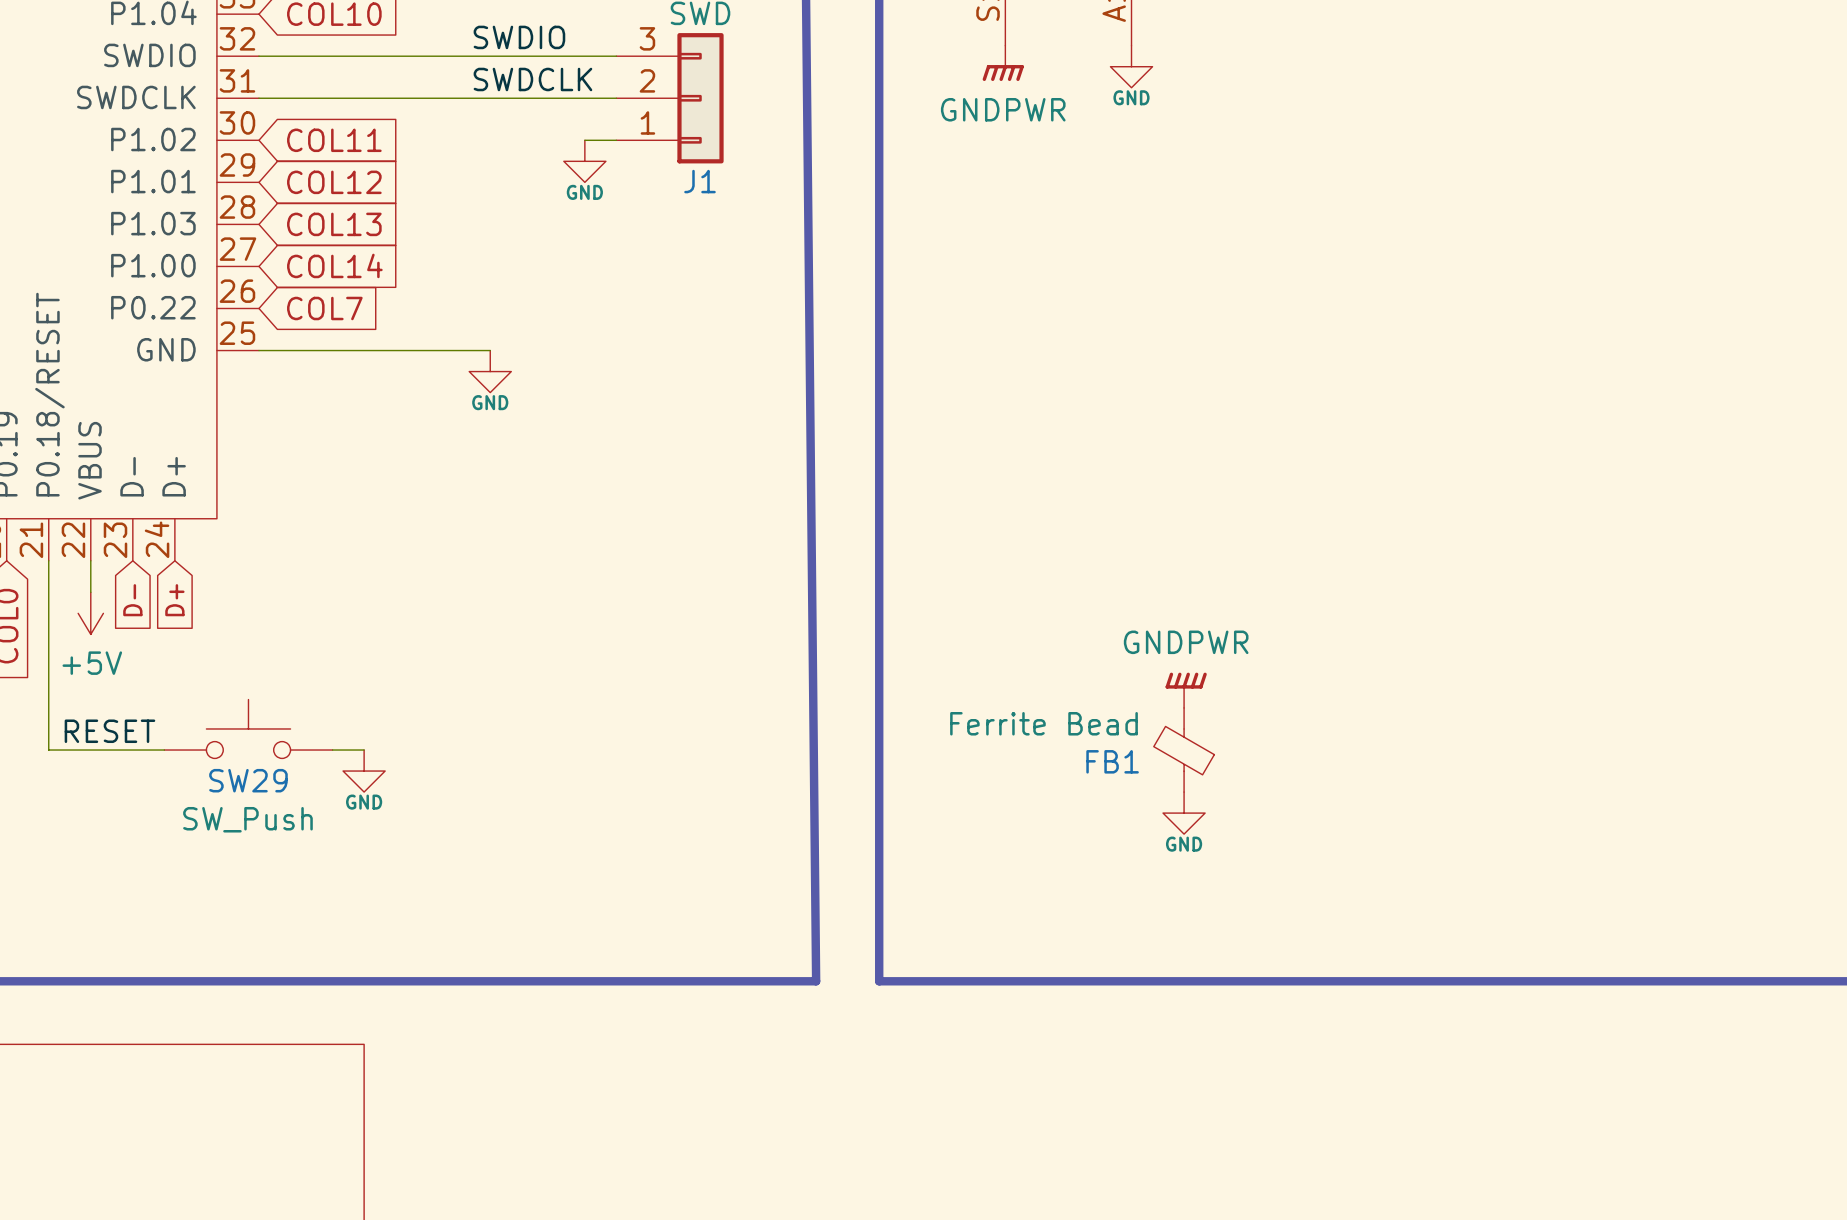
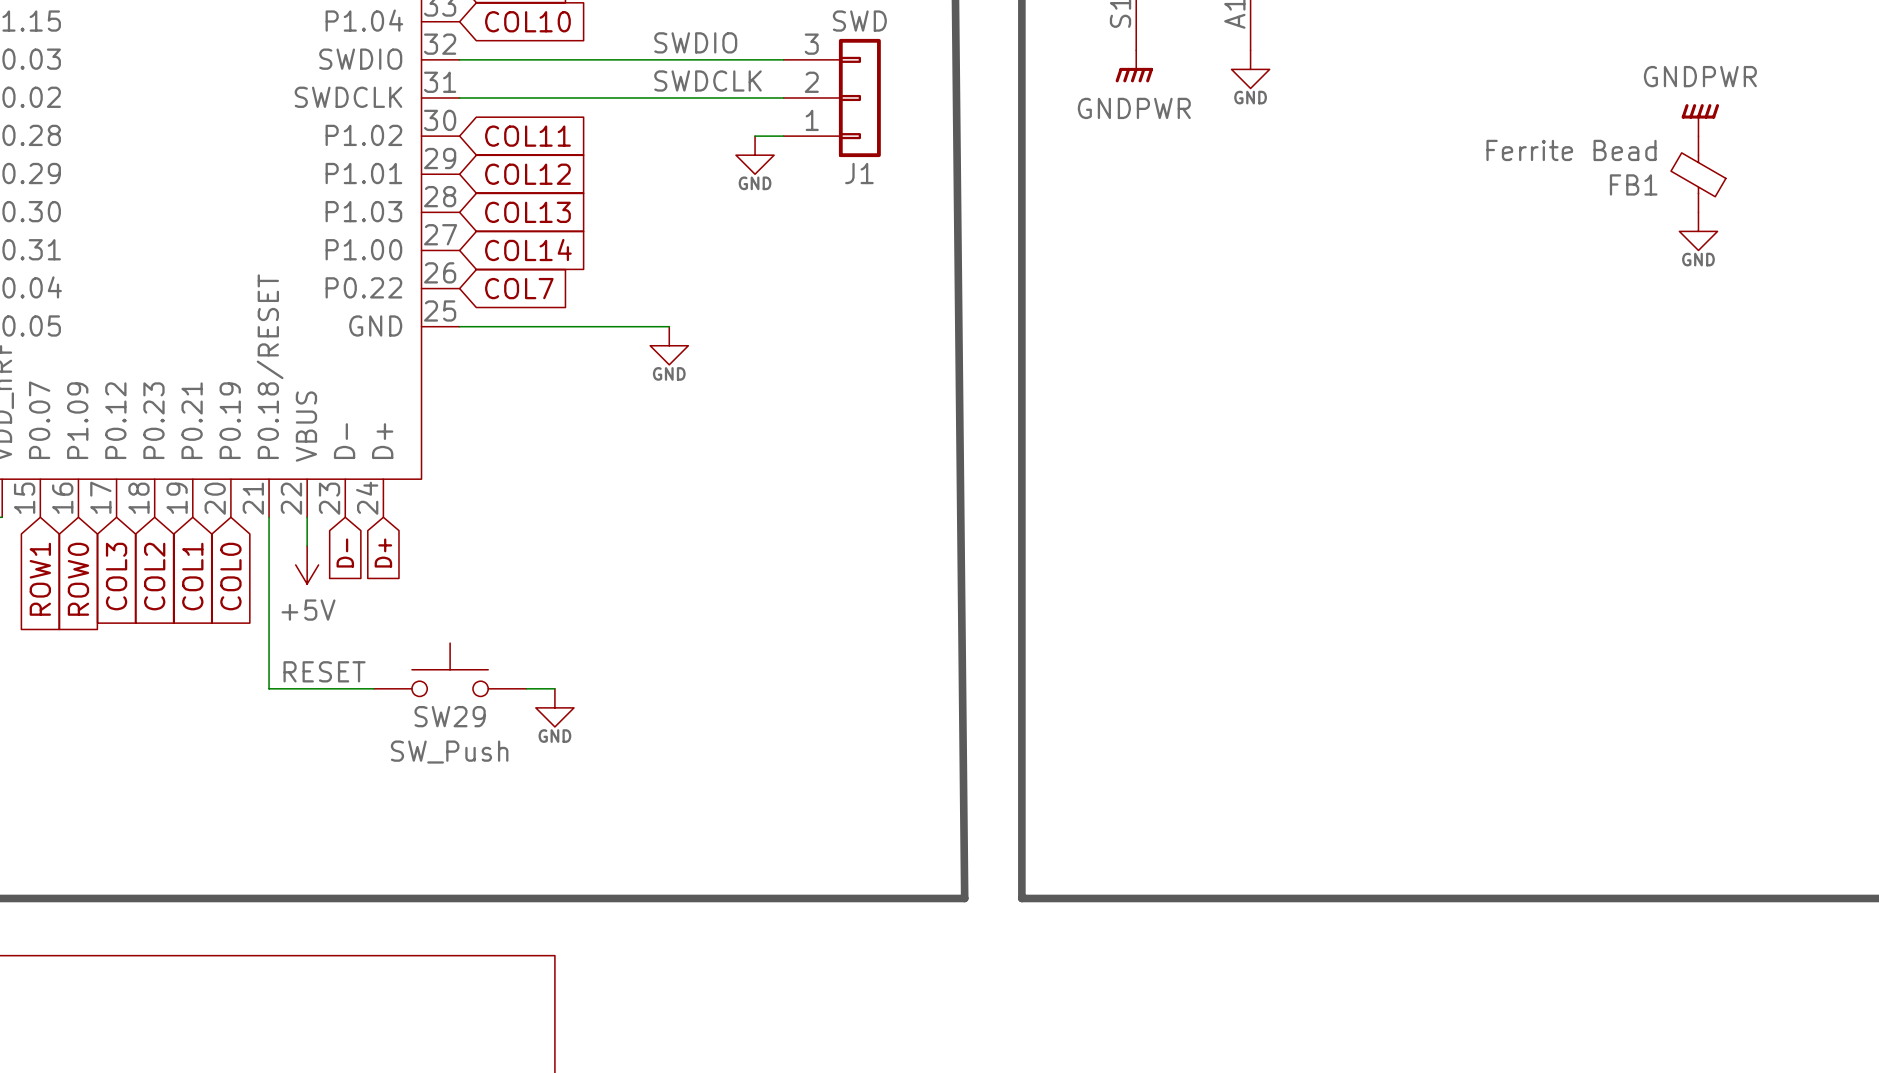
power symbol: none -> GNDPWR (1700, 120)
power symbol: none -> GND (1698, 231)
power symbol: GNDPWR (1186, 690) -> none
FB1 position: (1184, 750) -> (1698, 174)
power symbol: GND (1184, 813) -> none

